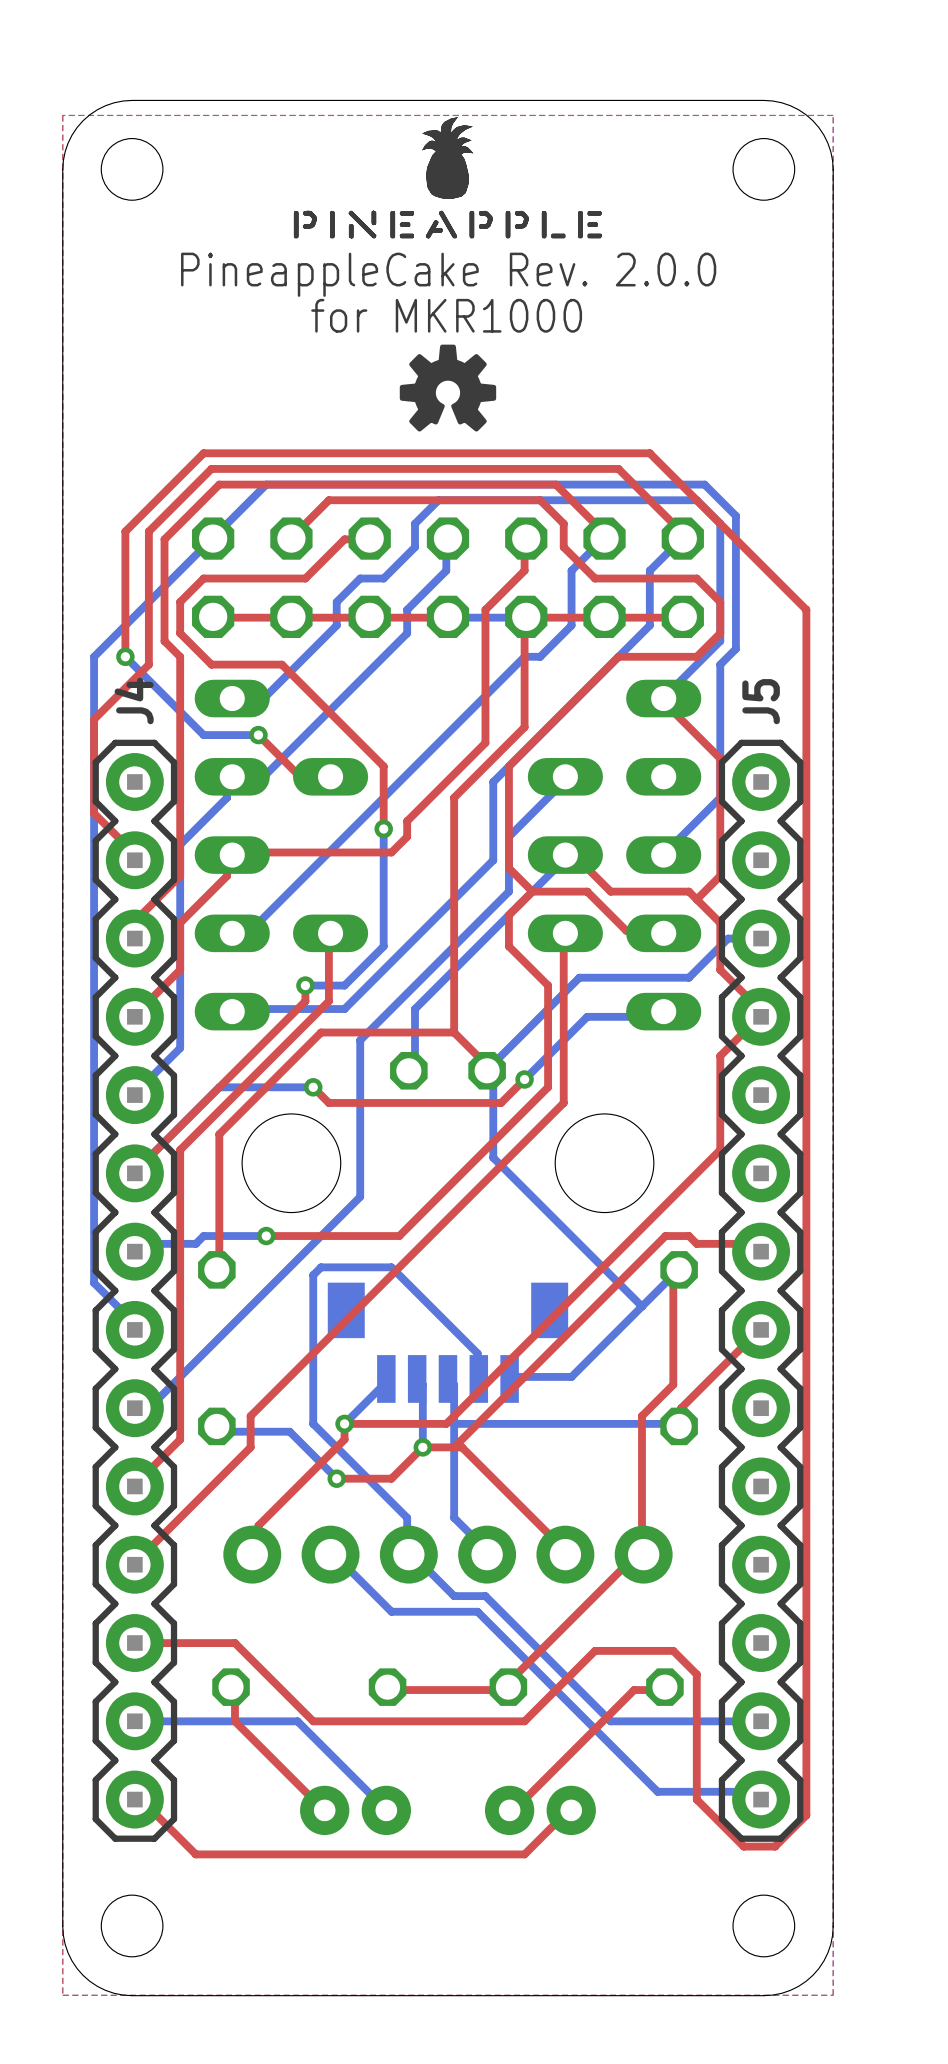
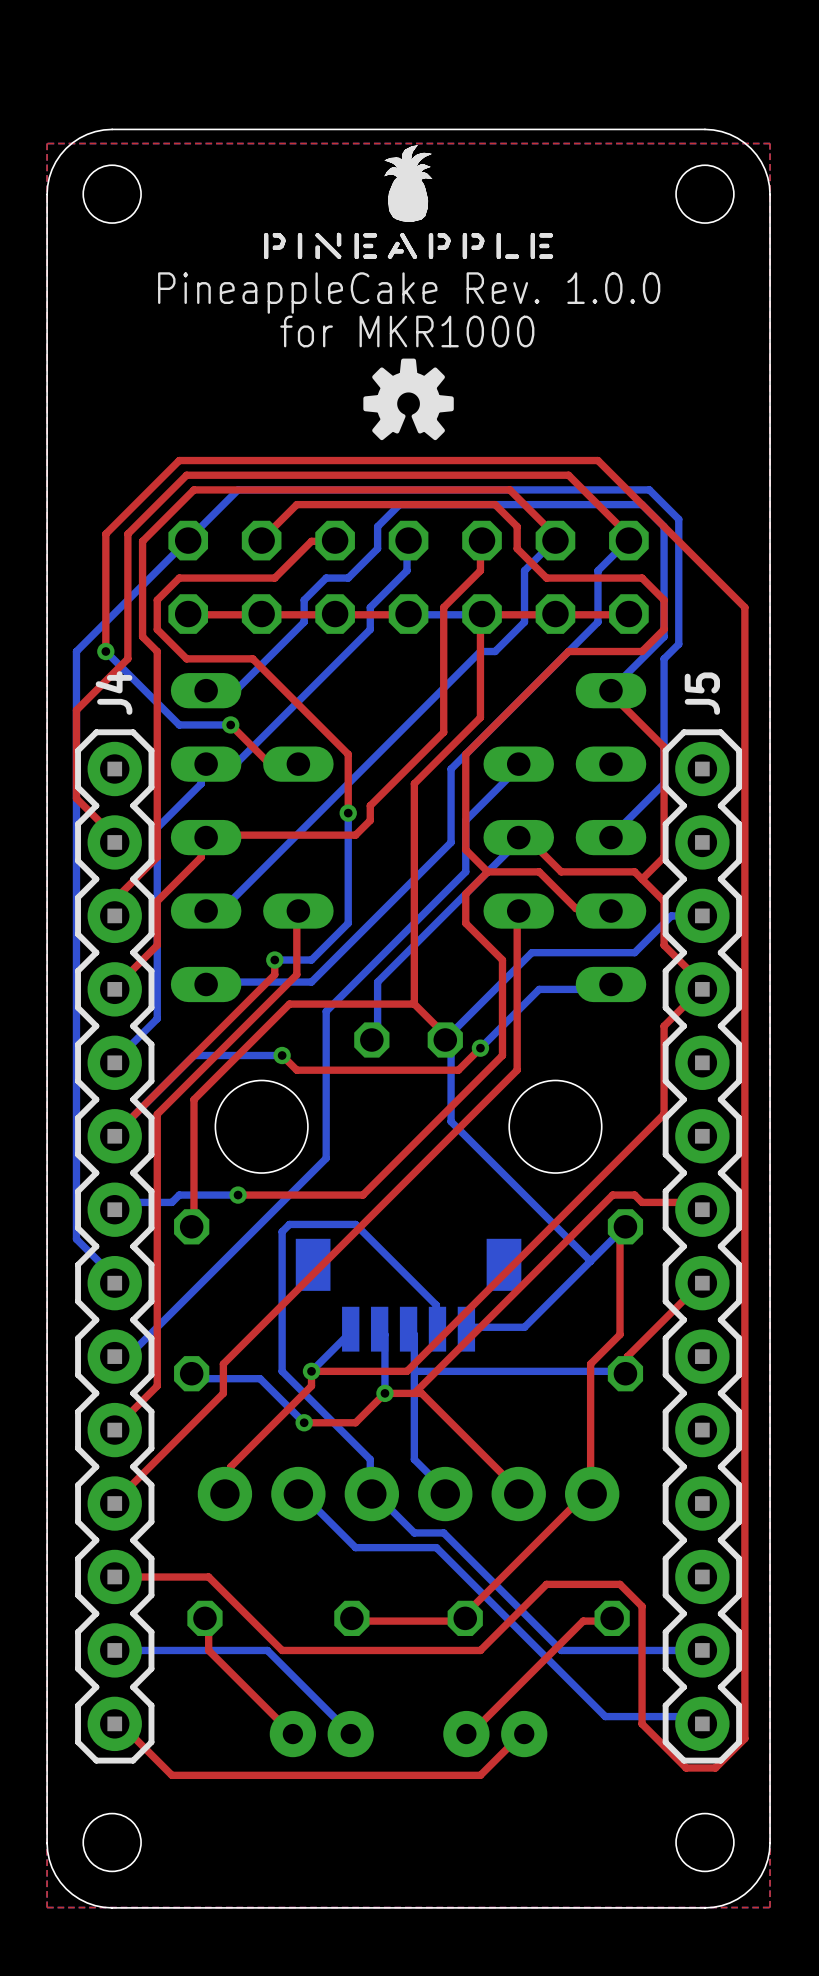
text: PineappleCake Rev. 2.0.0 (448, 274) -> PineappleCake Rev. 1.0.0 (409, 293)

